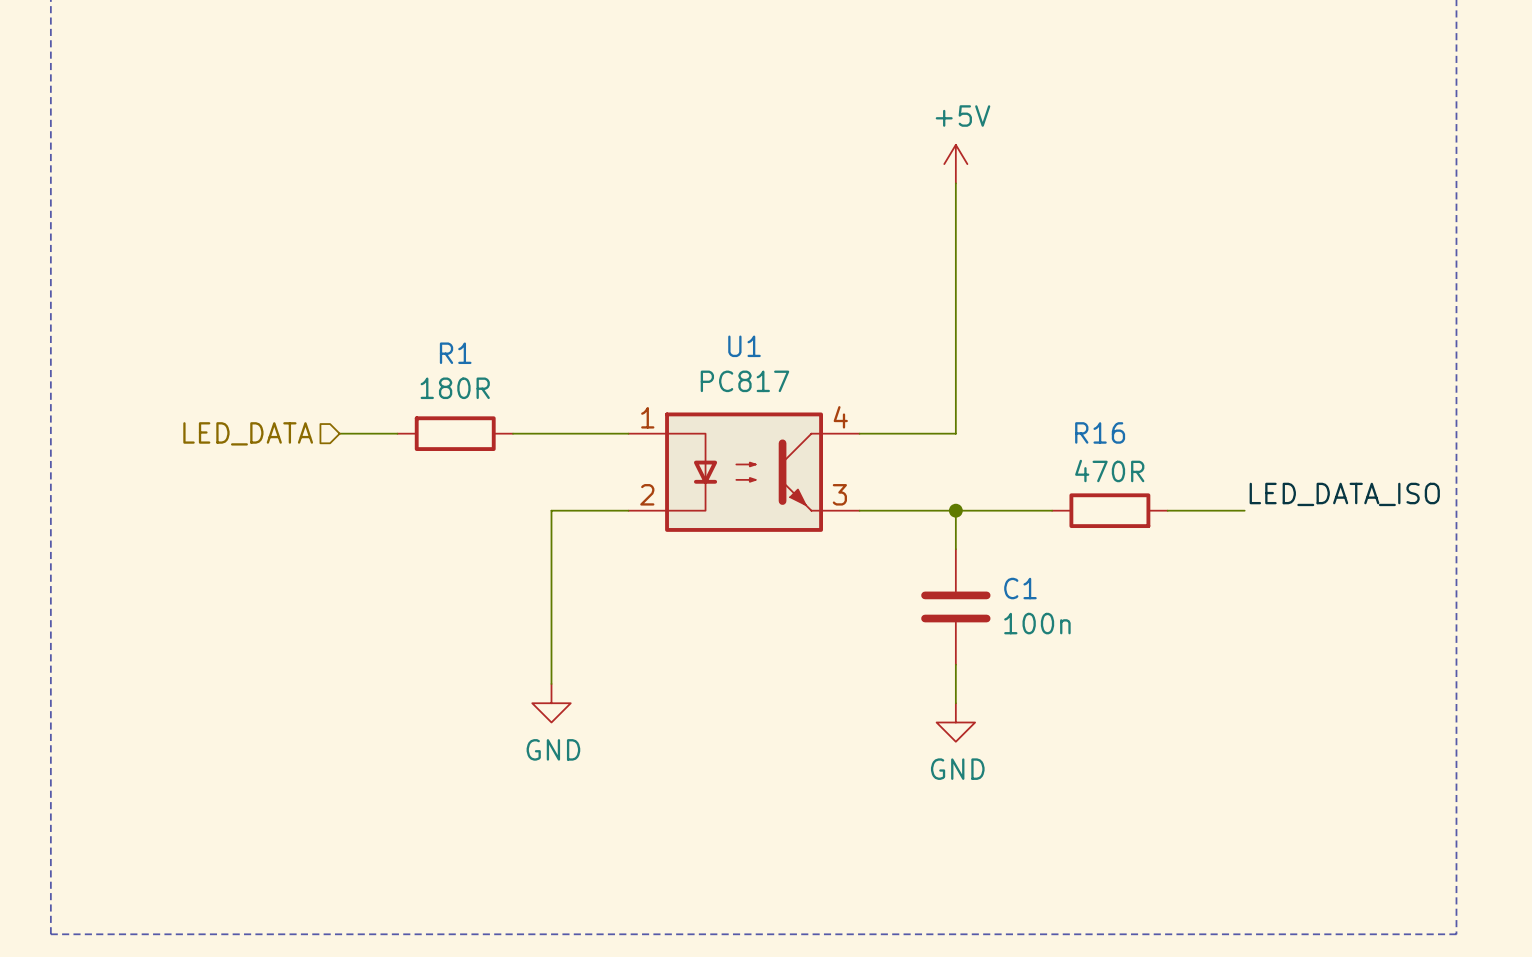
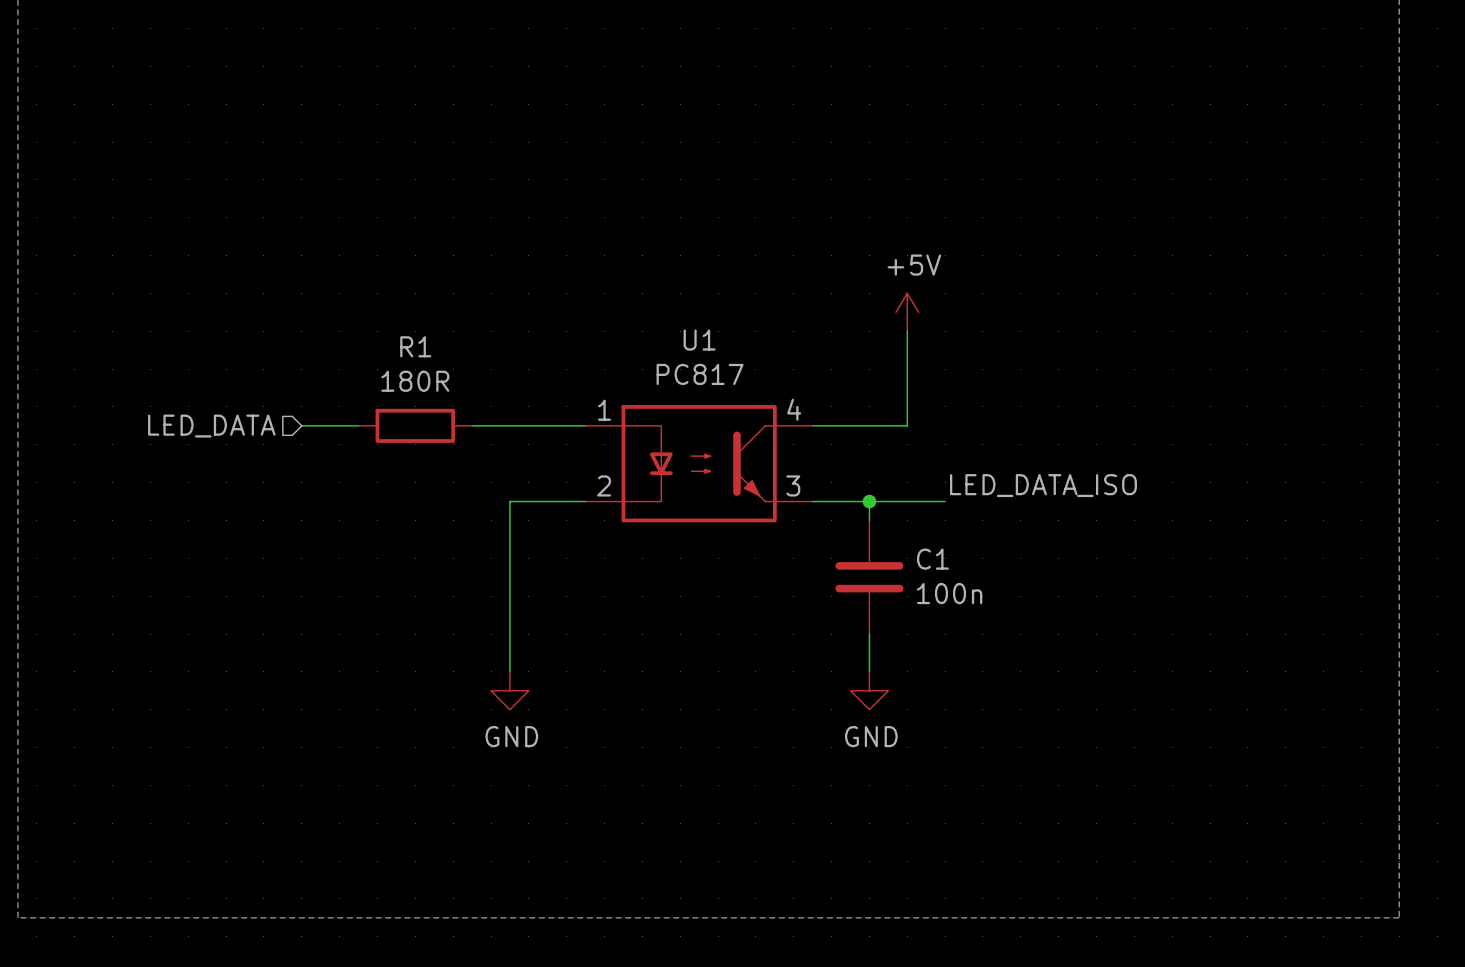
power symbol position: +5V (955, 164) -> +5V (907, 312)
wire: (955, 183) (955, 337) -> none
label position: LED_DATA_ISO (1344, 494) -> LED_DATA_ISO (1043, 485)
wire: none -> (869, 501) (869, 520)
wire: (955, 510) (955, 549) -> none
junction position: (955, 510) -> (869, 501)
wire: (994, 510) (1052, 510) -> none
R16: 470R (1109, 510) -> none
wire: (1167, 510) (1244, 510) -> none
C1 position: (955, 606) -> (869, 577)
wire: (955, 664) (955, 703) -> (869, 634) (869, 671)
power symbol position: GND (955, 722) -> GND (869, 690)

